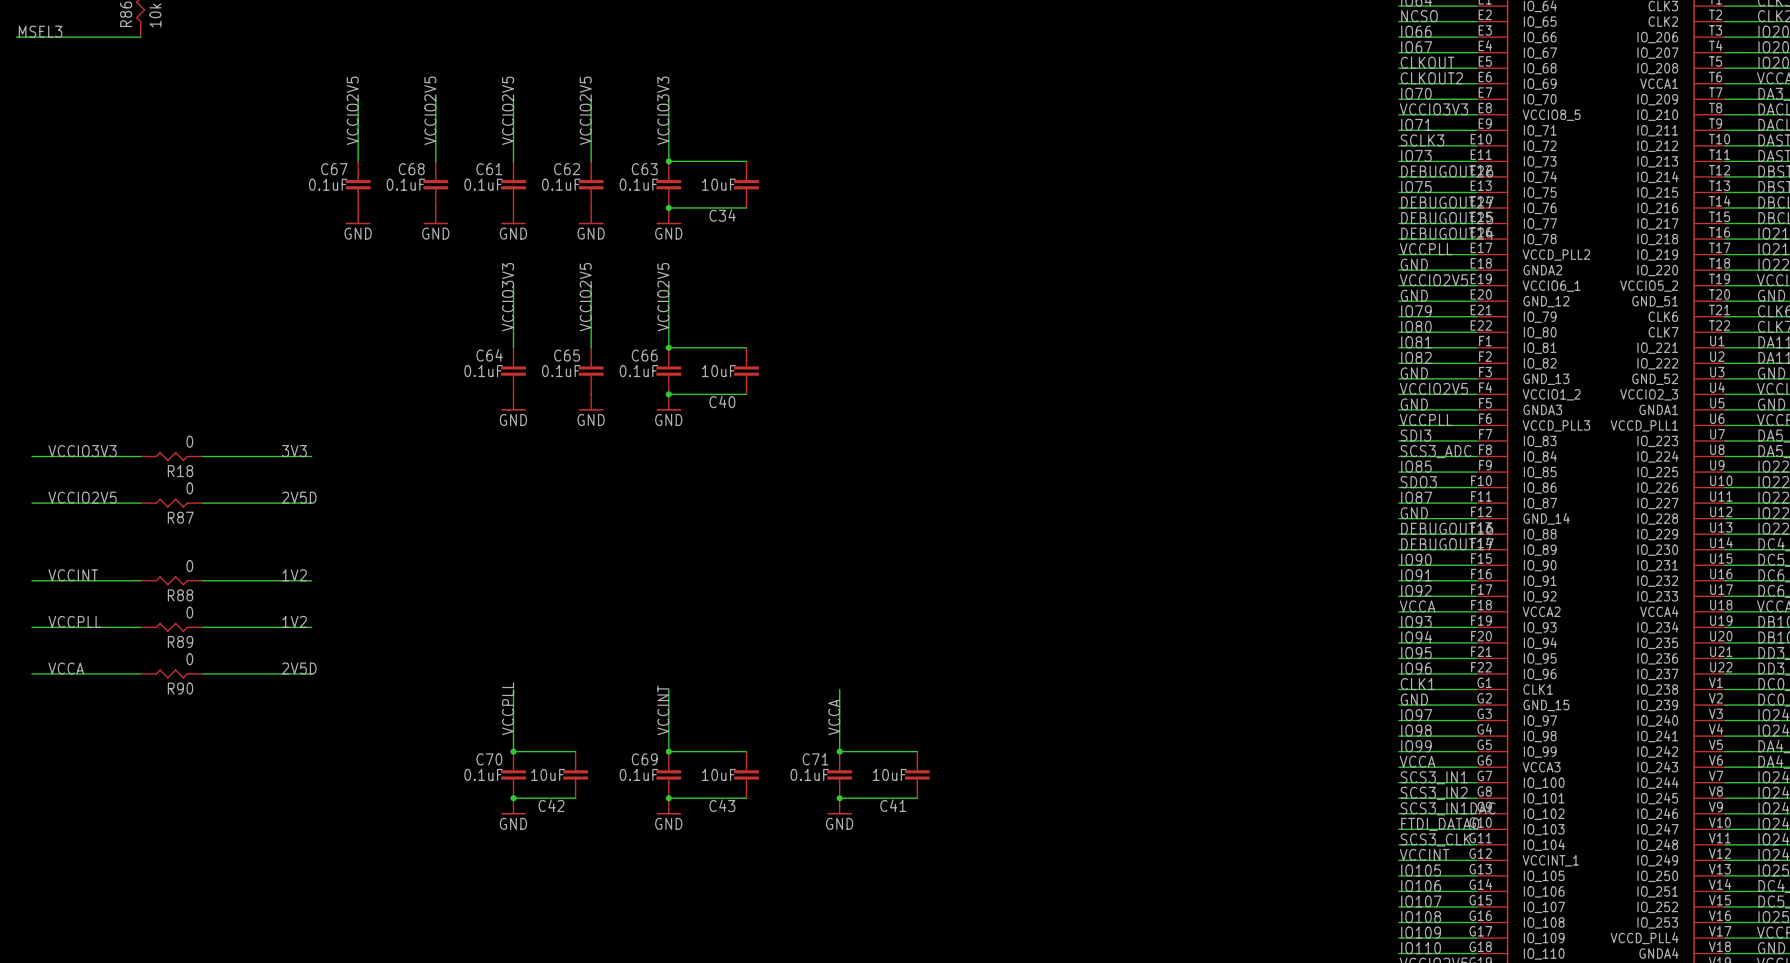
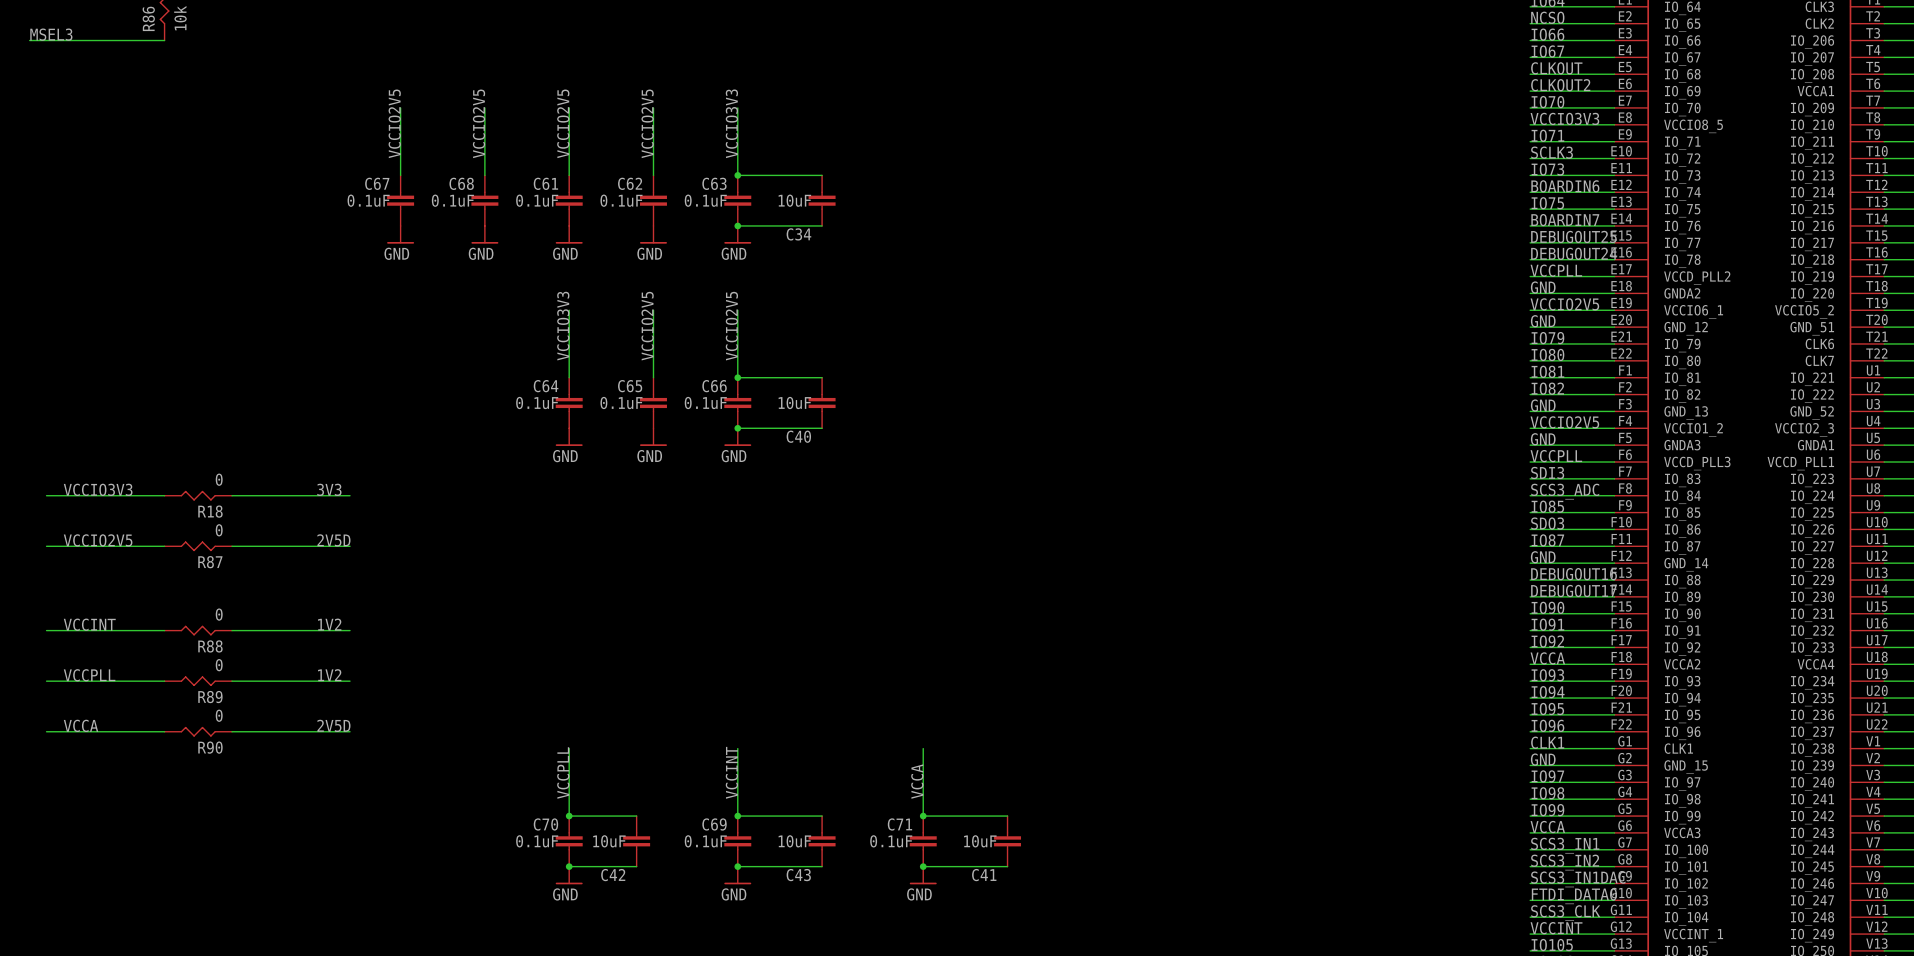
label: DEBUGOUT26 (1447, 171) -> BOARDIN6 (1565, 186)
label: DEBUGOUT27 (1447, 202) -> BOARDIN7 (1565, 220)

